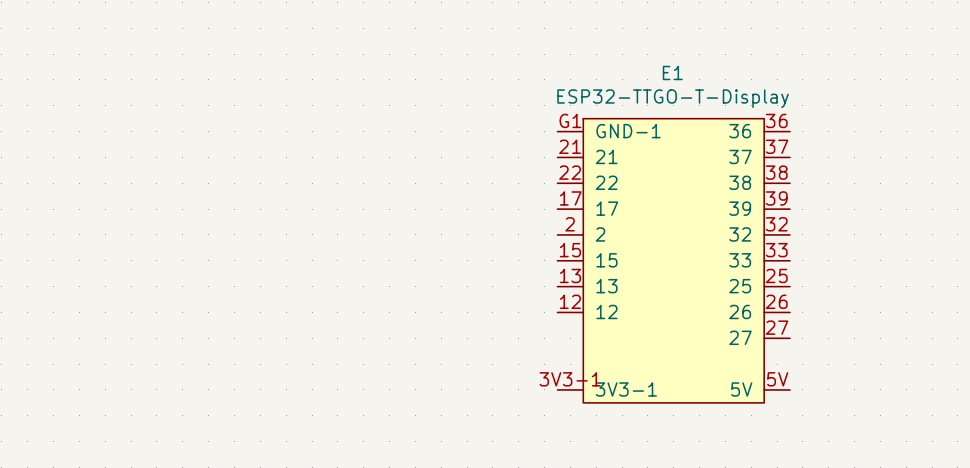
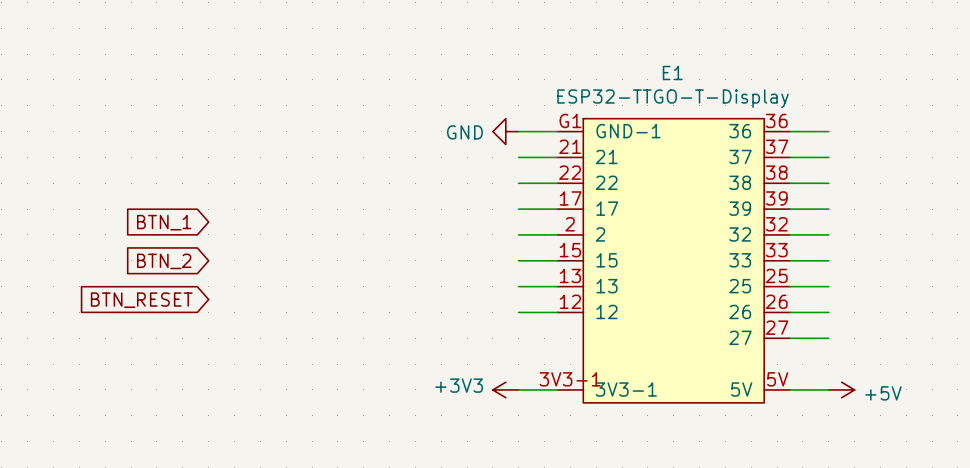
power symbol: none -> GND (505, 131)
wire: none -> (518, 131) (557, 131)
wire: none -> (790, 131) (828, 131)
wire: none -> (518, 157) (557, 157)
wire: none -> (790, 157) (828, 157)
wire: none -> (518, 183) (557, 183)
wire: none -> (790, 183) (828, 183)
wire: none -> (518, 209) (557, 209)
wire: none -> (790, 209) (828, 209)
global label: none -> BTN_1 (164, 222)
wire: none -> (518, 234) (557, 234)
wire: none -> (790, 234) (828, 234)
wire: none -> (518, 260) (557, 260)
wire: none -> (790, 260) (828, 260)
global label: none -> BTN_2 (164, 261)
wire: none -> (518, 286) (557, 286)
wire: none -> (790, 286) (828, 286)
global label: none -> BTN_RESET (141, 300)
wire: none -> (518, 312) (557, 312)
wire: none -> (790, 312) (828, 312)
wire: none -> (790, 338) (828, 338)
power symbol: none -> +3V3 (505, 389)
wire: none -> (518, 389) (557, 389)
wire: none -> (790, 389) (828, 389)
power symbol: none -> +5V (841, 389)

